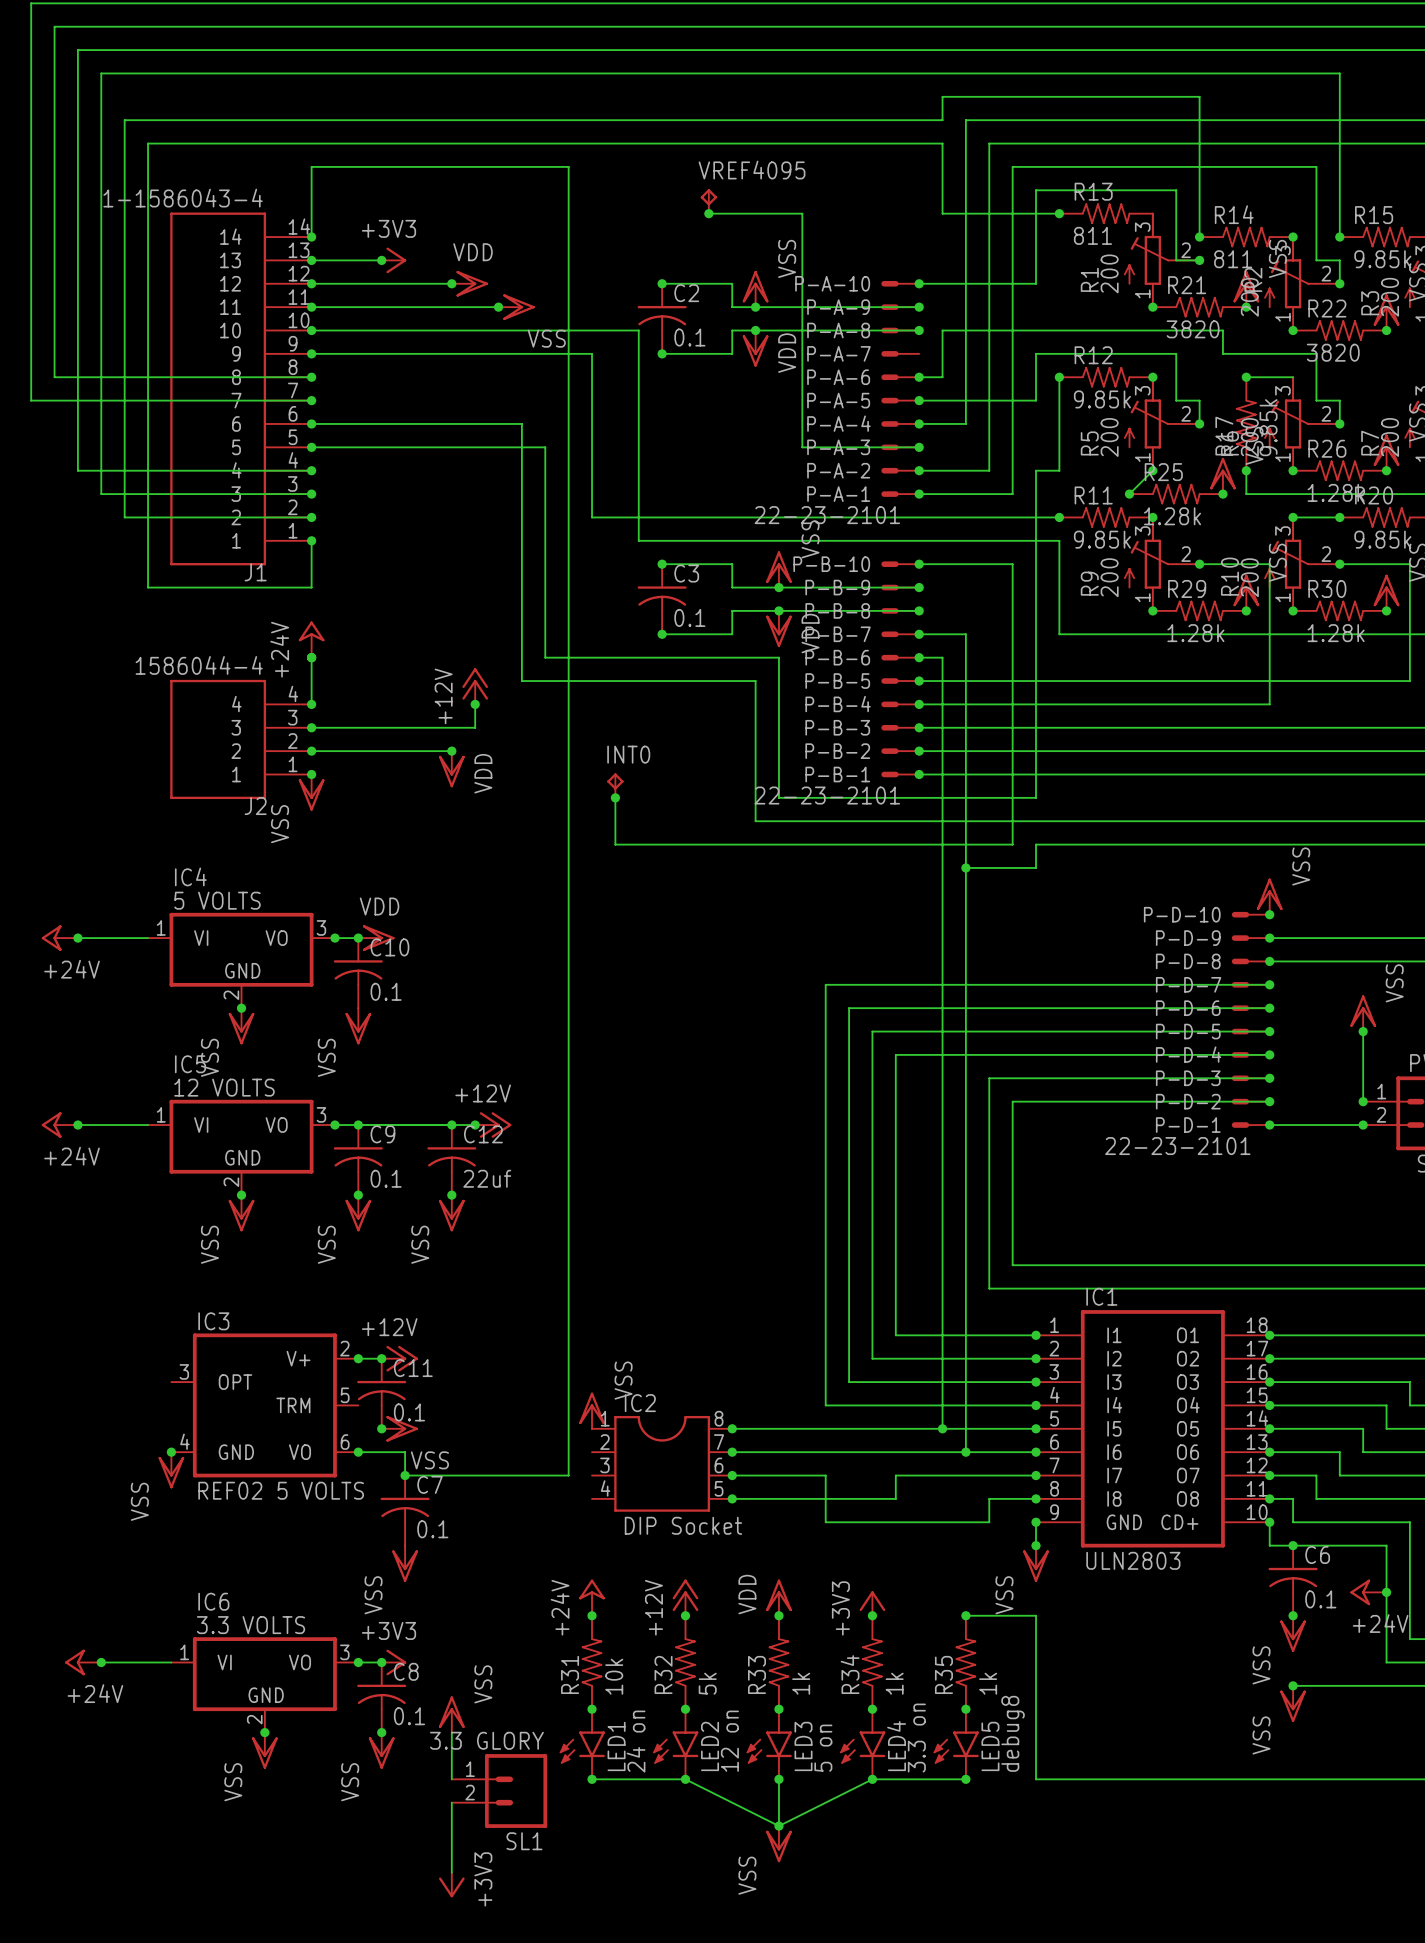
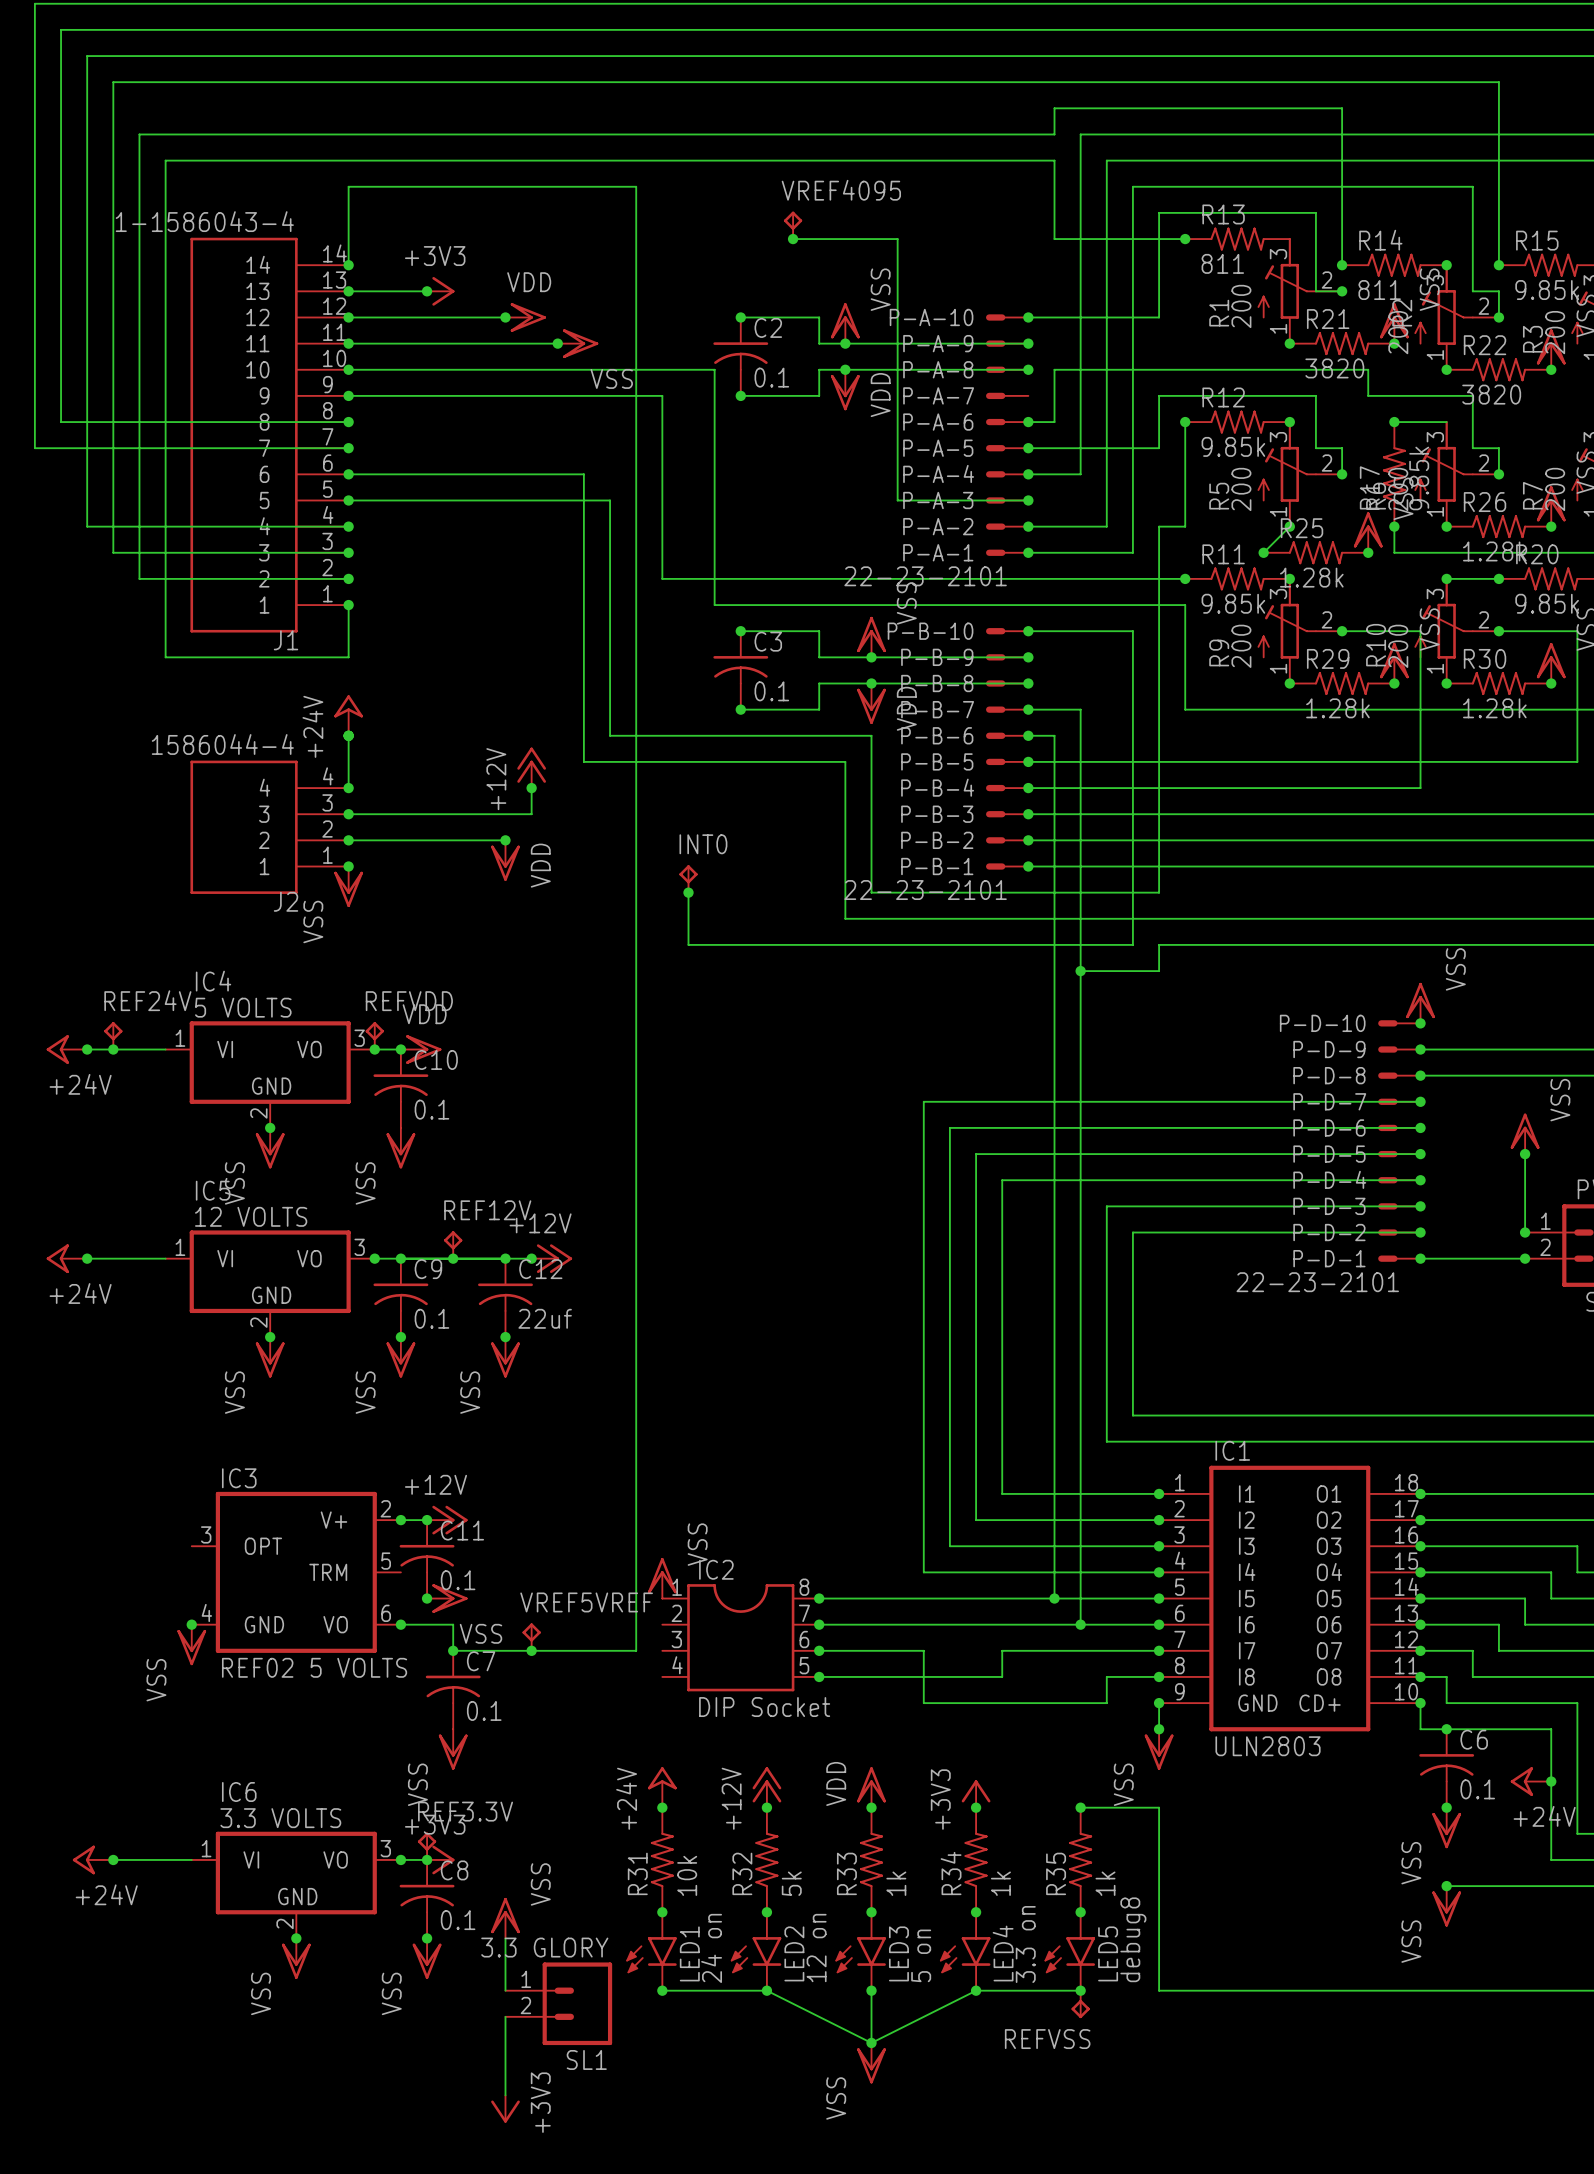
REF24V: none -> (113, 1035)
REFVDD: none -> (374, 1035)
junction: none -> (113, 1049)
REF12V: none -> (453, 1244)
junction: none -> (453, 1258)
VREF5VREF: none -> (531, 1637)
junction: none -> (531, 1650)
REF3.3V: none -> (427, 1846)
REFVSS: none -> (1080, 2004)

